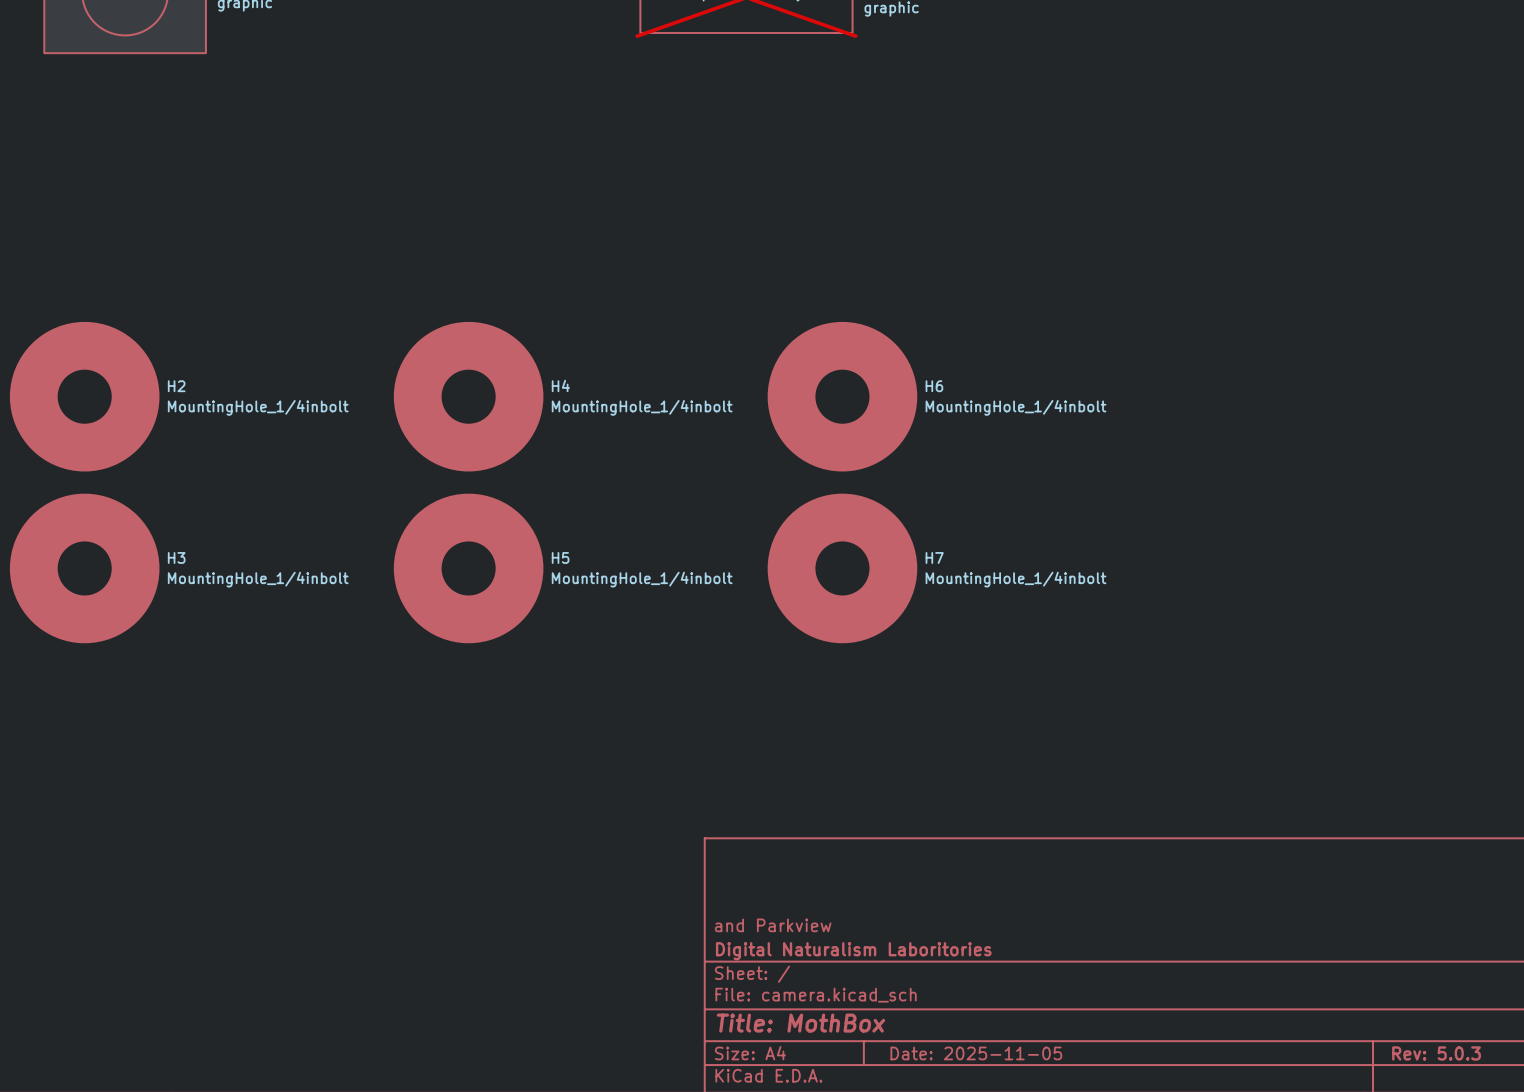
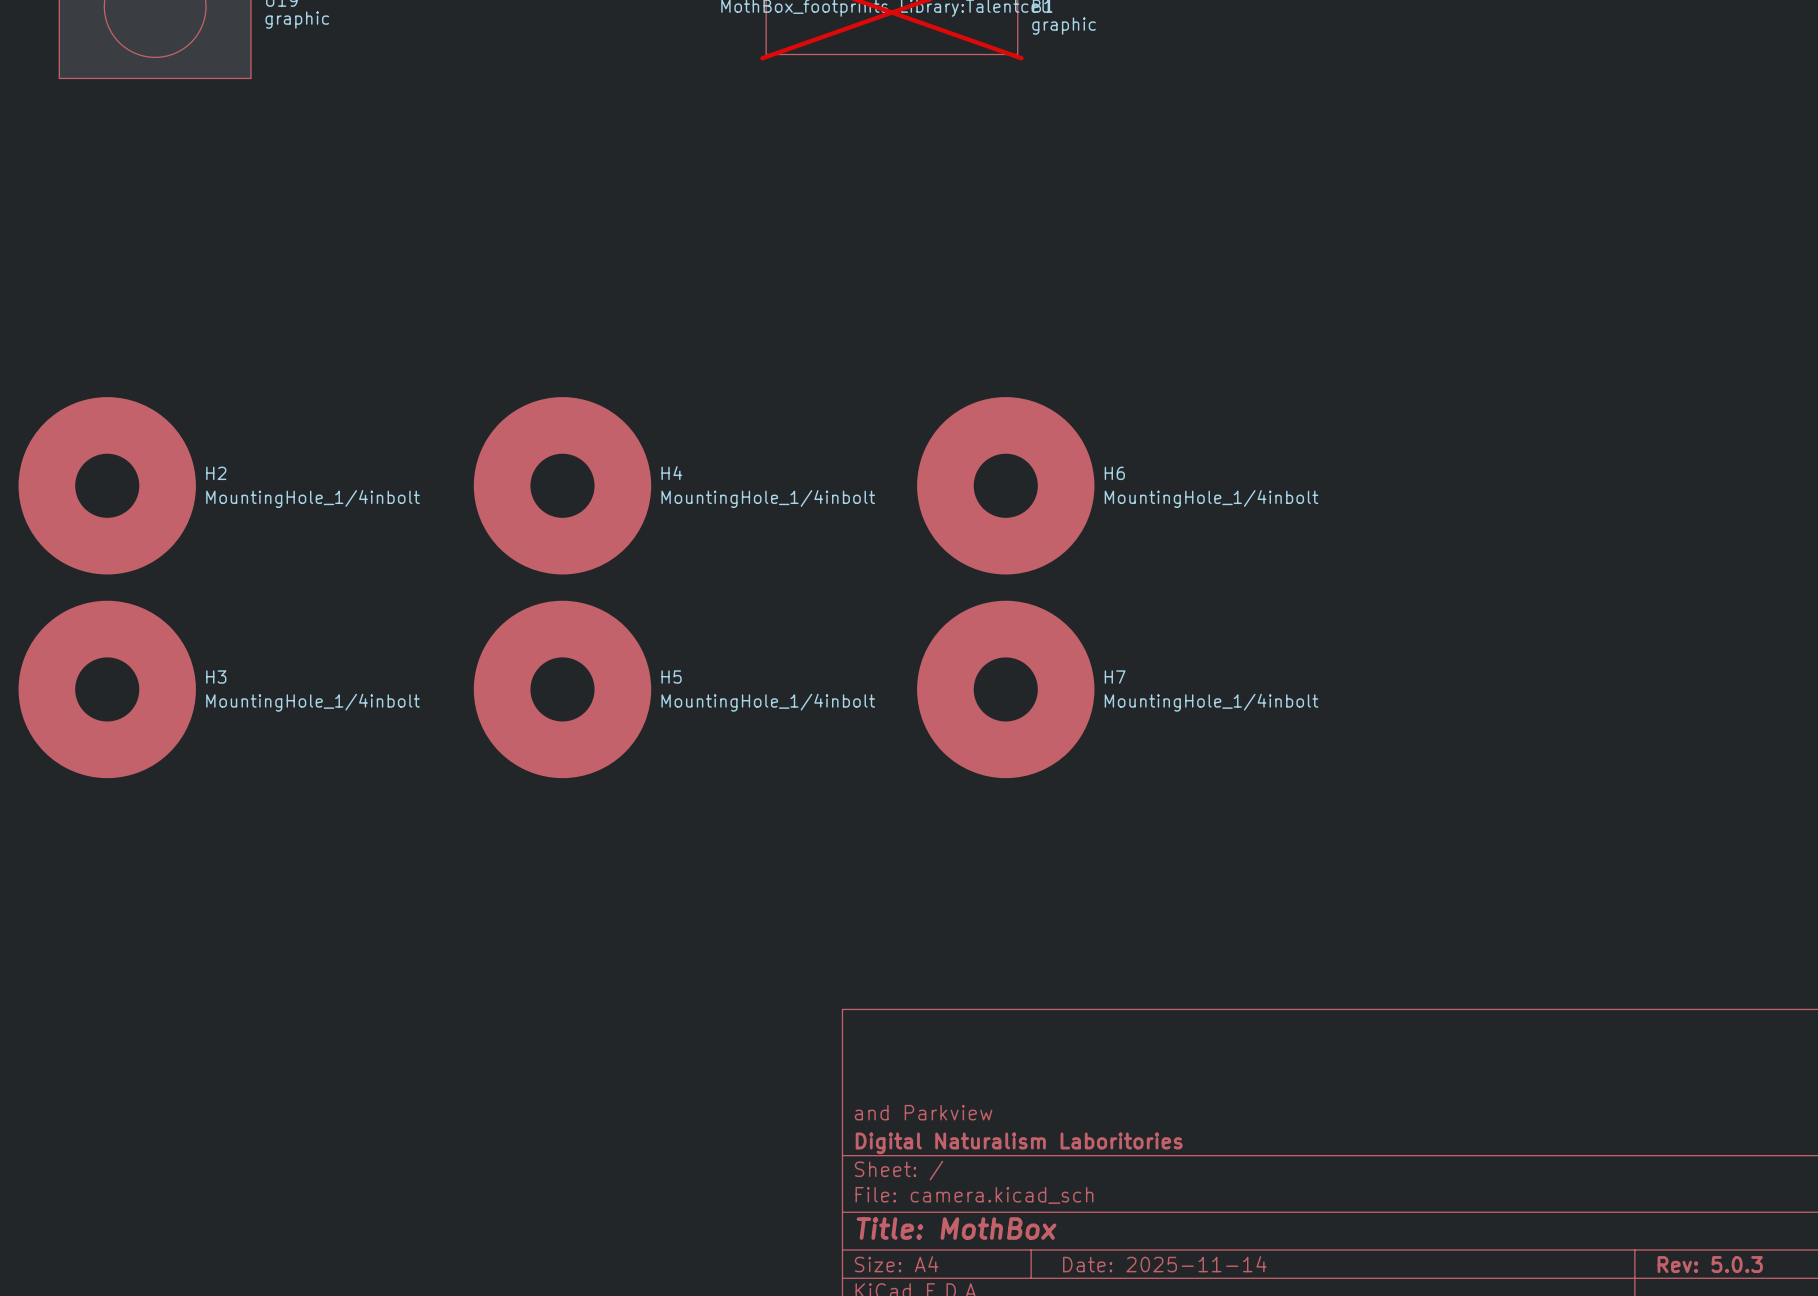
title block: Date: 2025-11-05 (976, 1053) -> Date: 2025-11-14 (1164, 1264)

